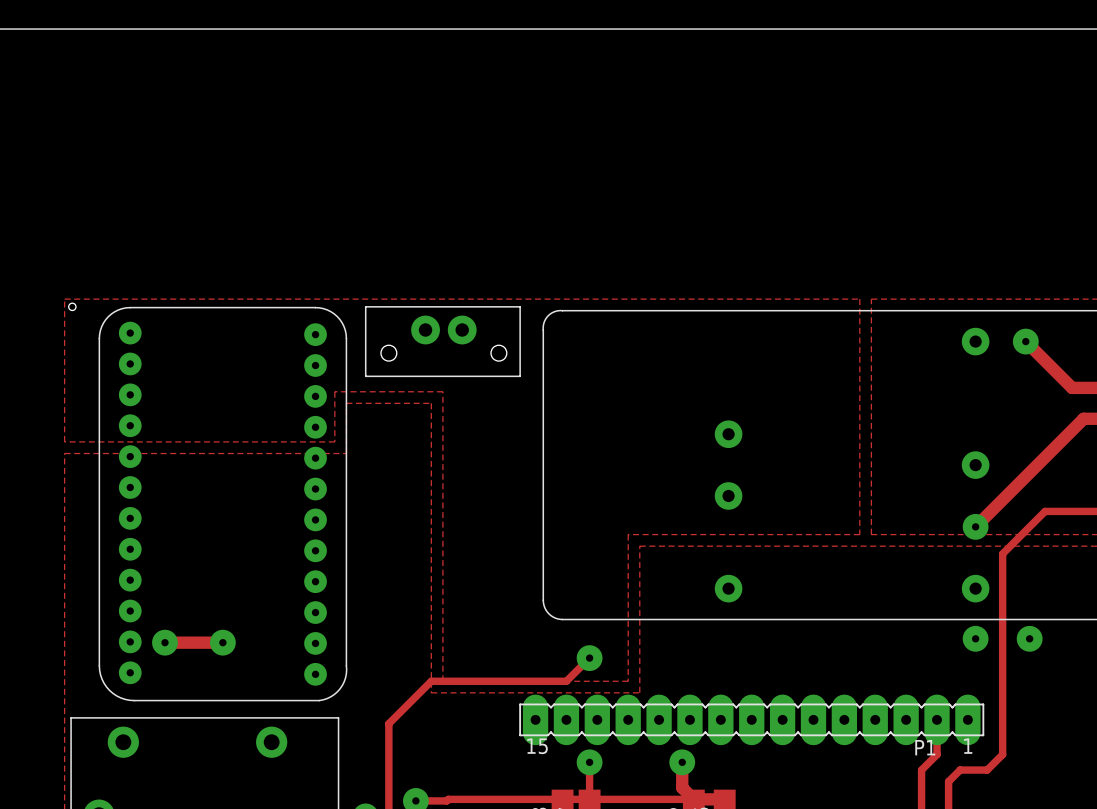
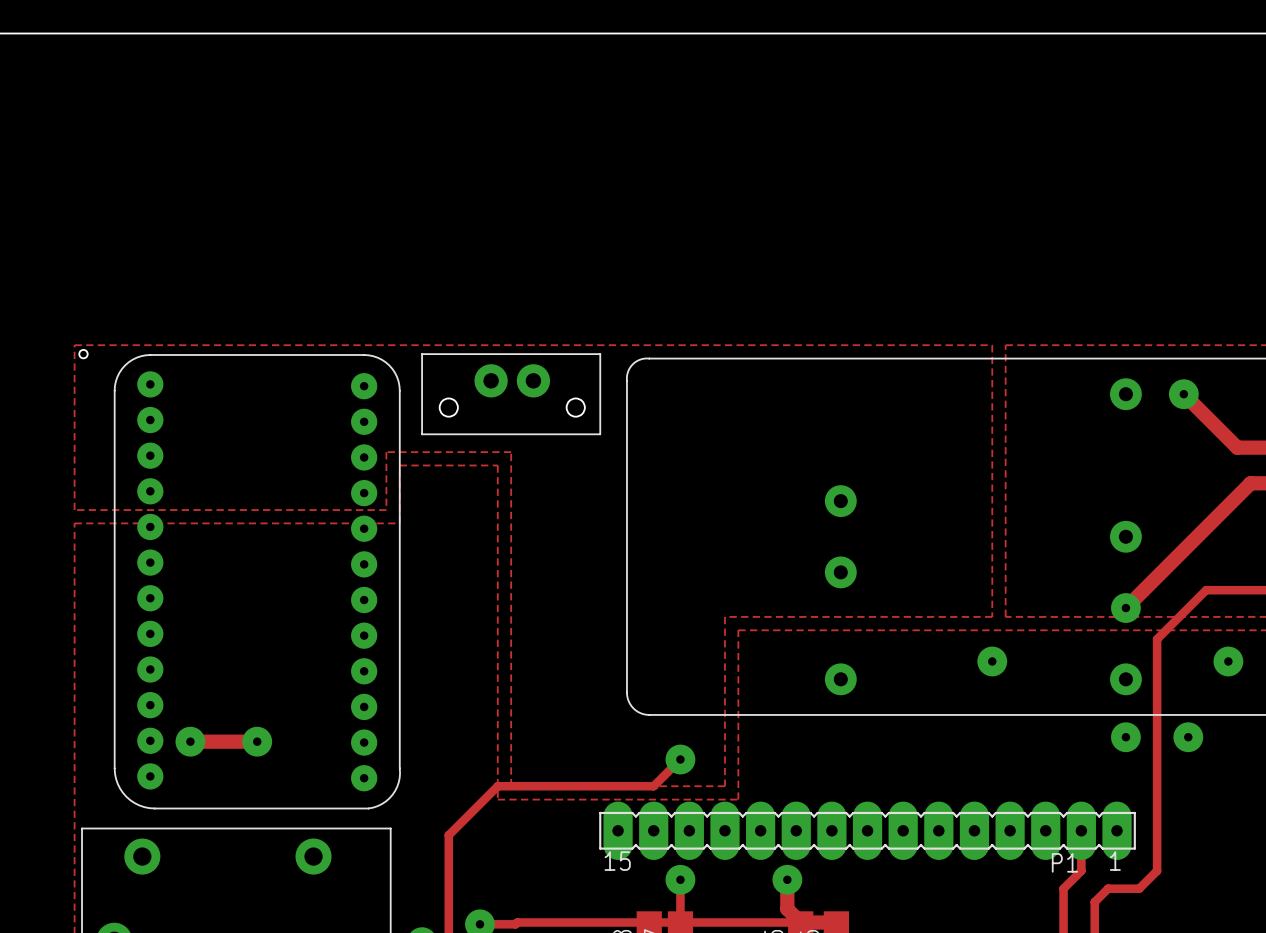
via: none -> (992, 661)
via: none -> (1228, 661)

